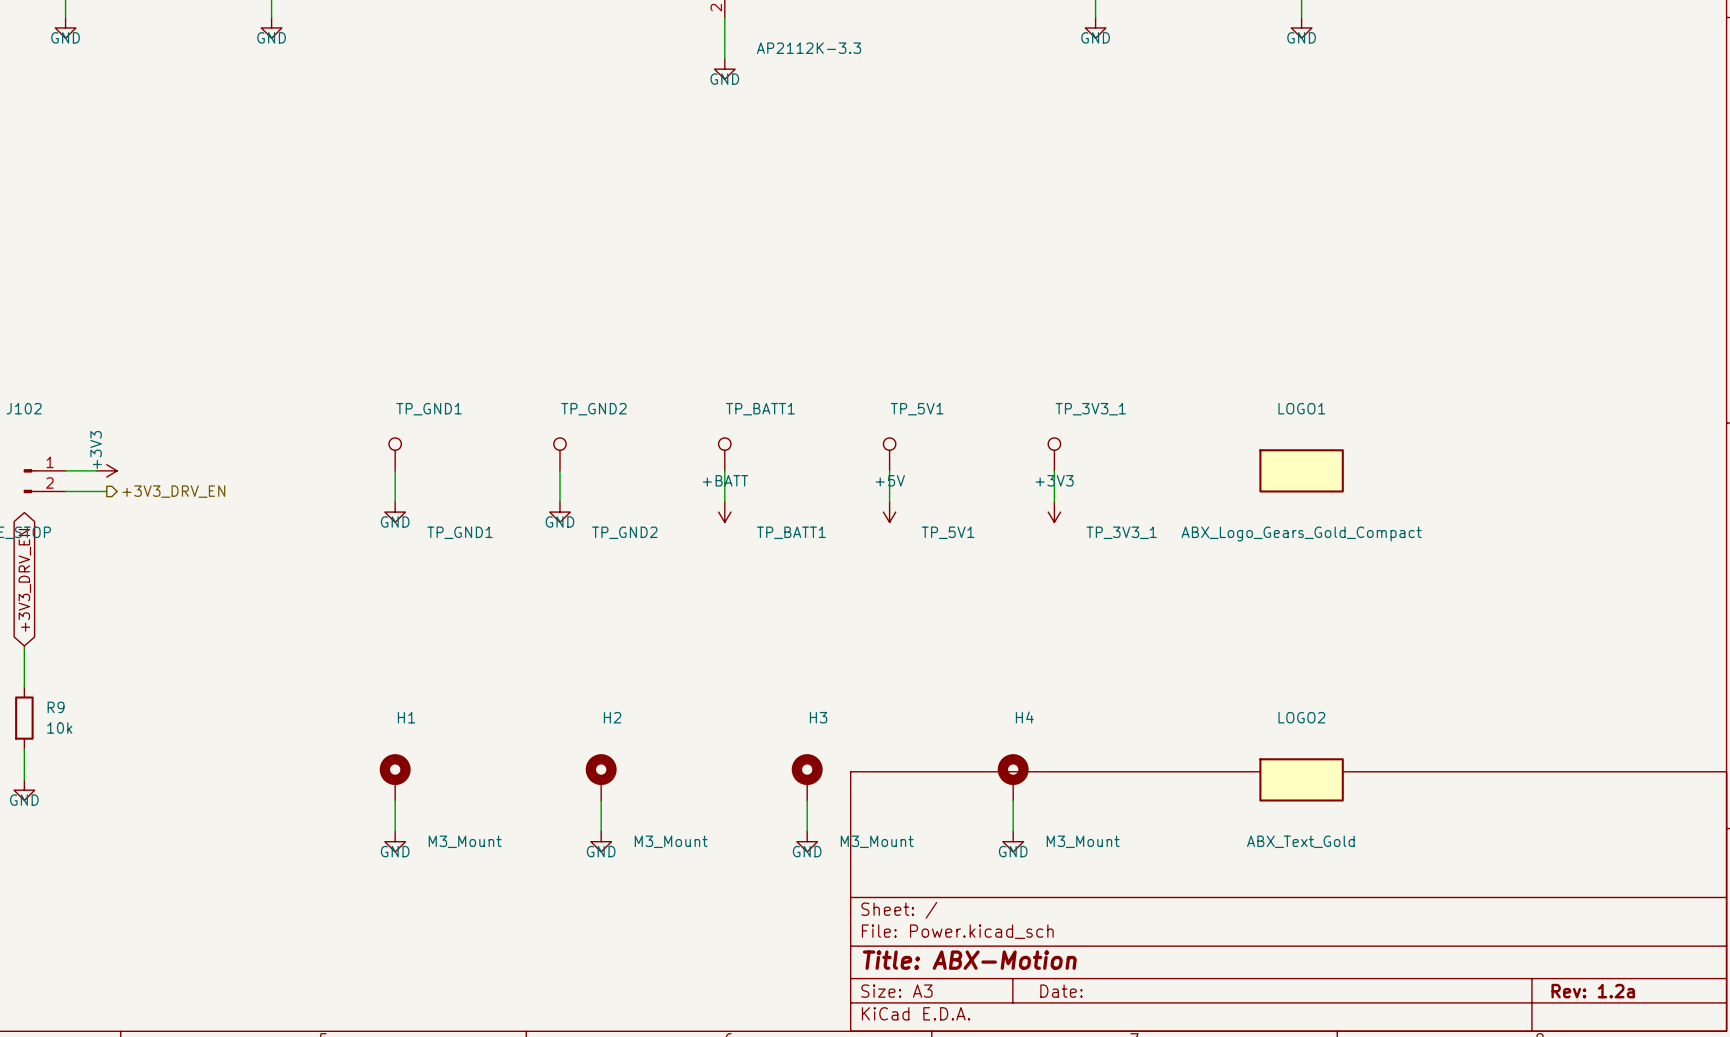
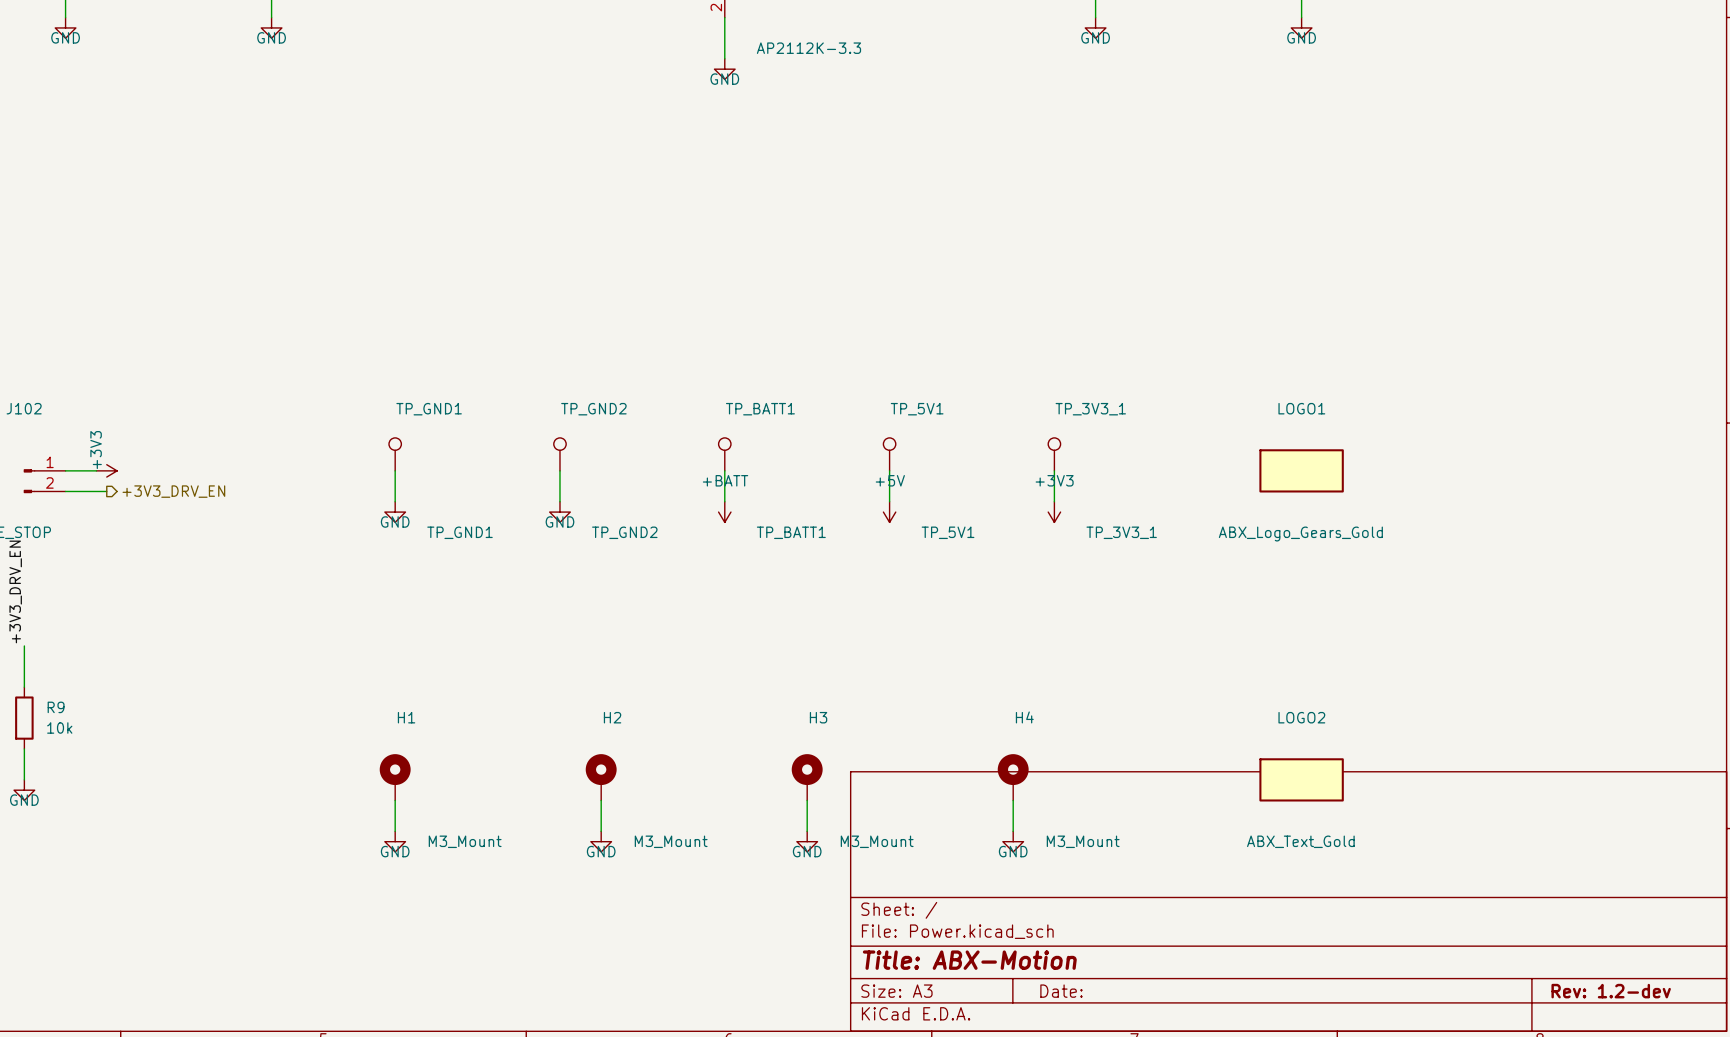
LOGO1 value: ABX_Logo_Gears_Gold_Compact (1301, 534) -> ABX_Logo_Gears_Gold (1300, 534)
global label: +3V3_DRV_EN (24, 580) -> none
label: none -> +3V3_DRV_EN (15, 591)
title block: Rev: 1.2a (1593, 991) -> Rev: 1.2-dev (1611, 991)

